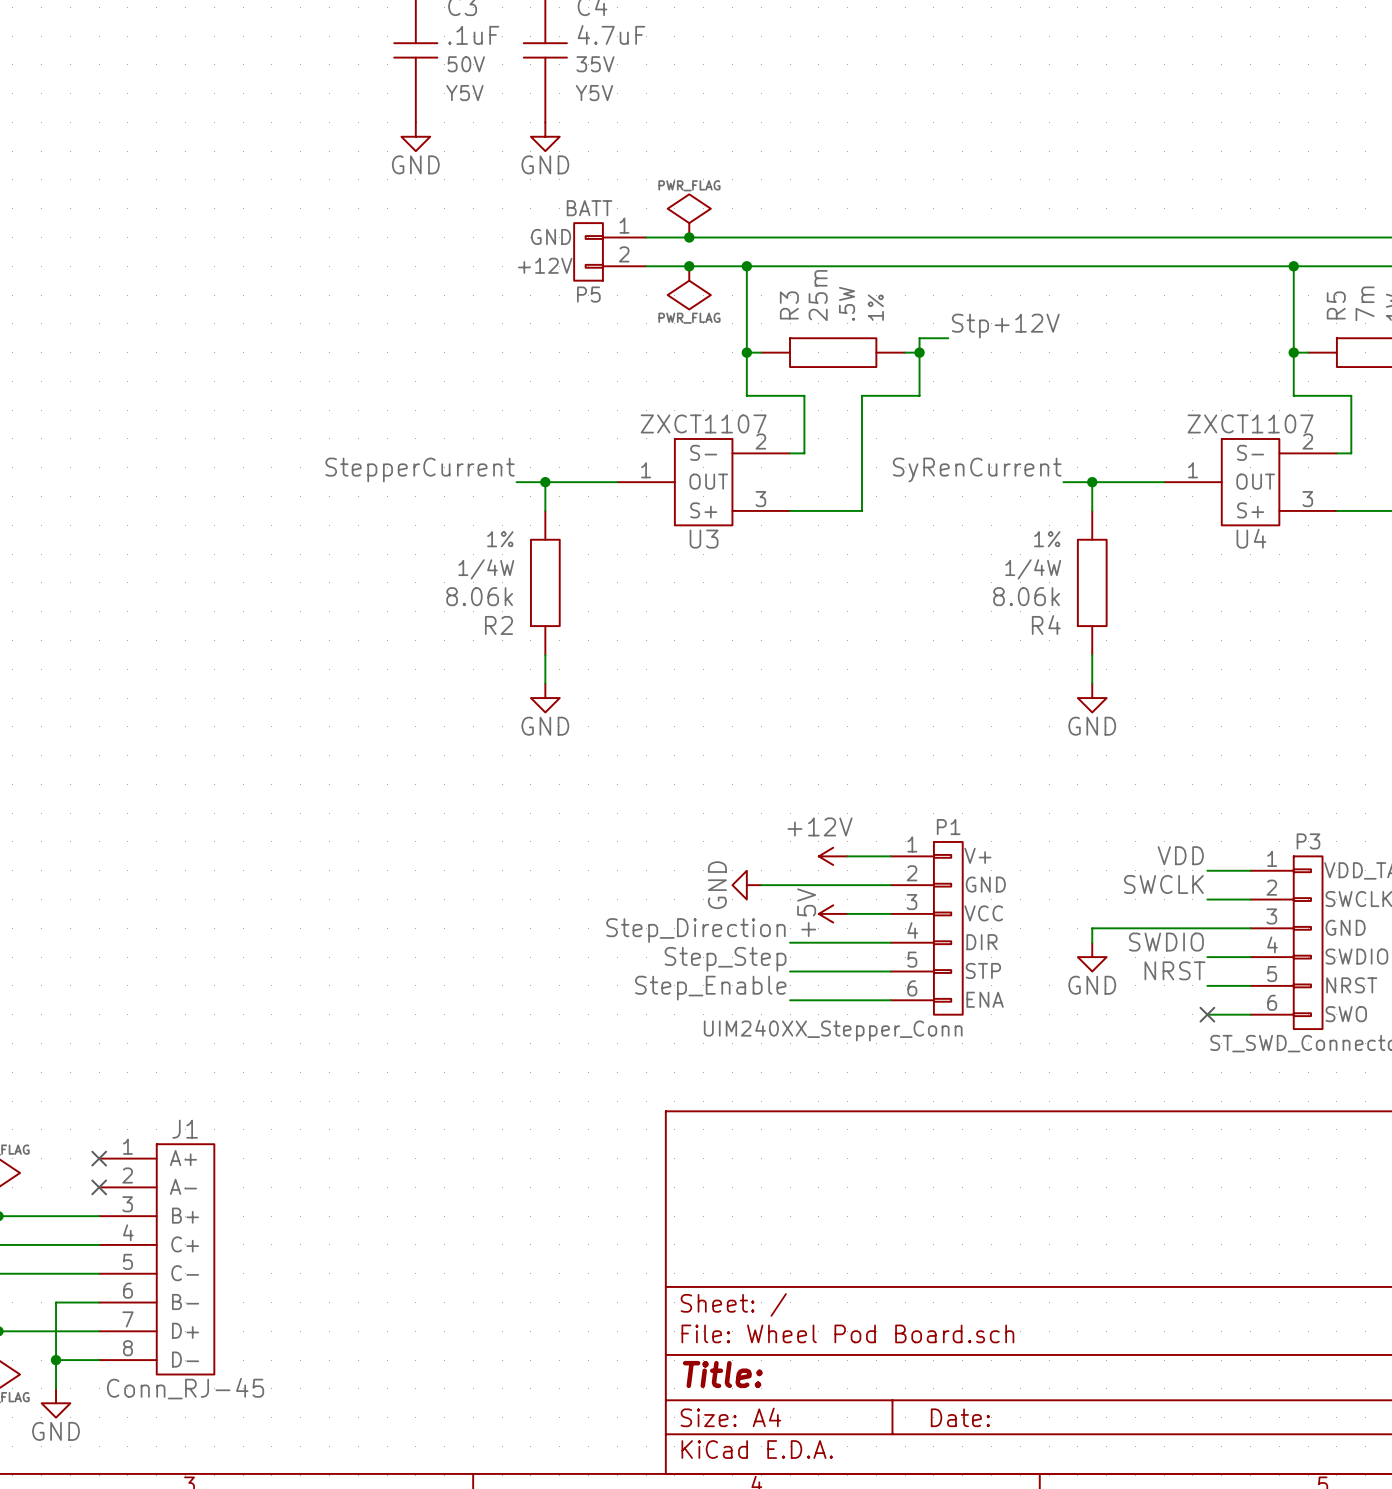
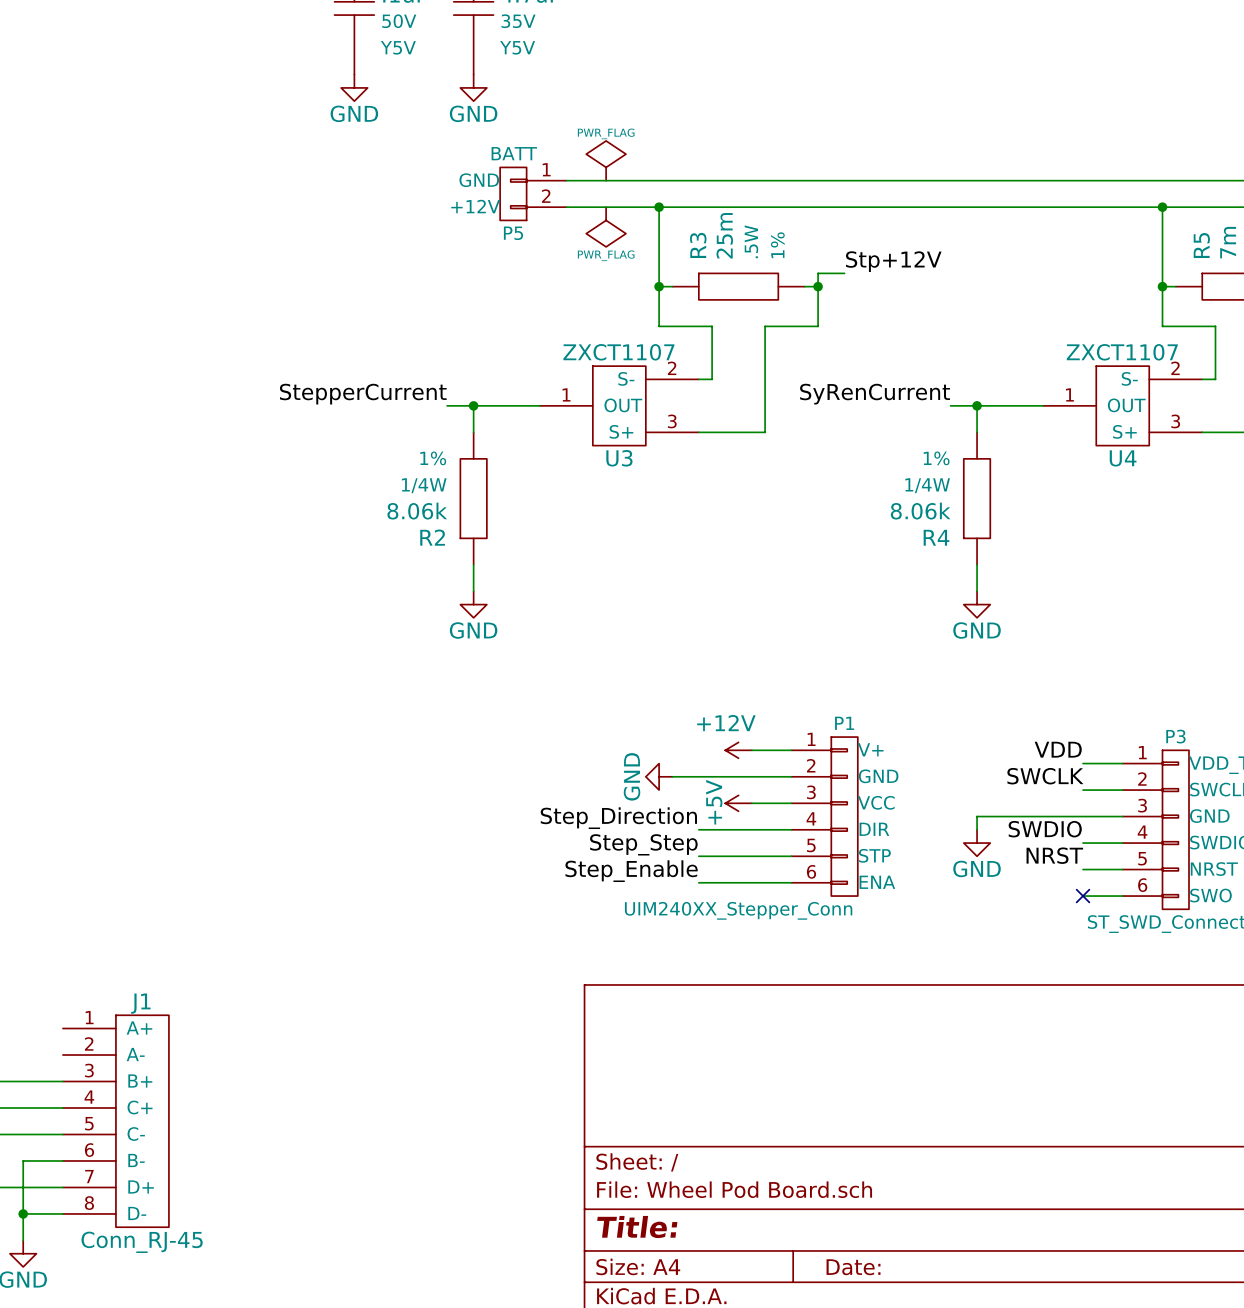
junction: (689, 237) -> none
junction: (689, 266) -> none
no-connect mark: (99, 1158) -> none
no-connect mark: (99, 1187) -> none

